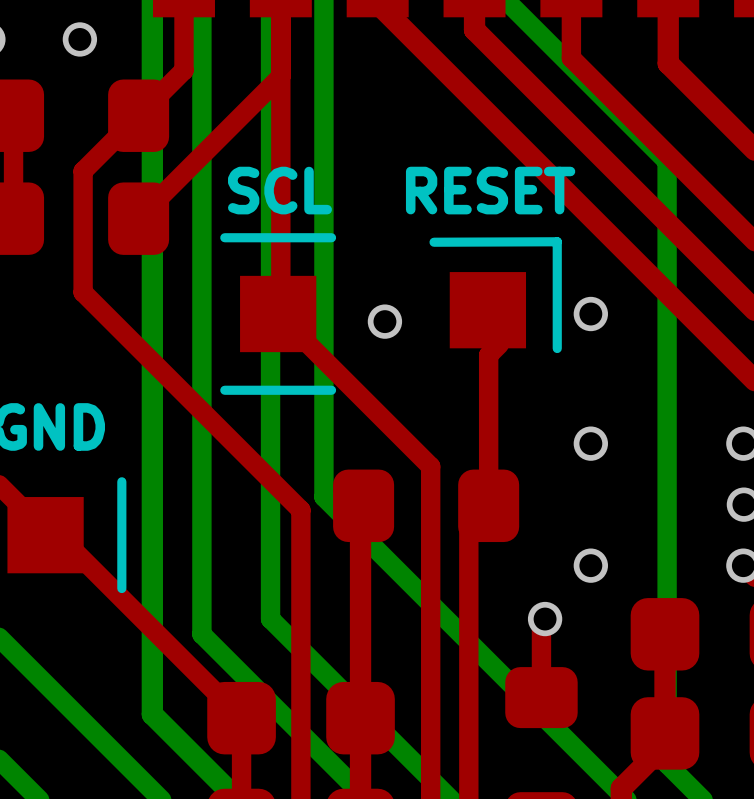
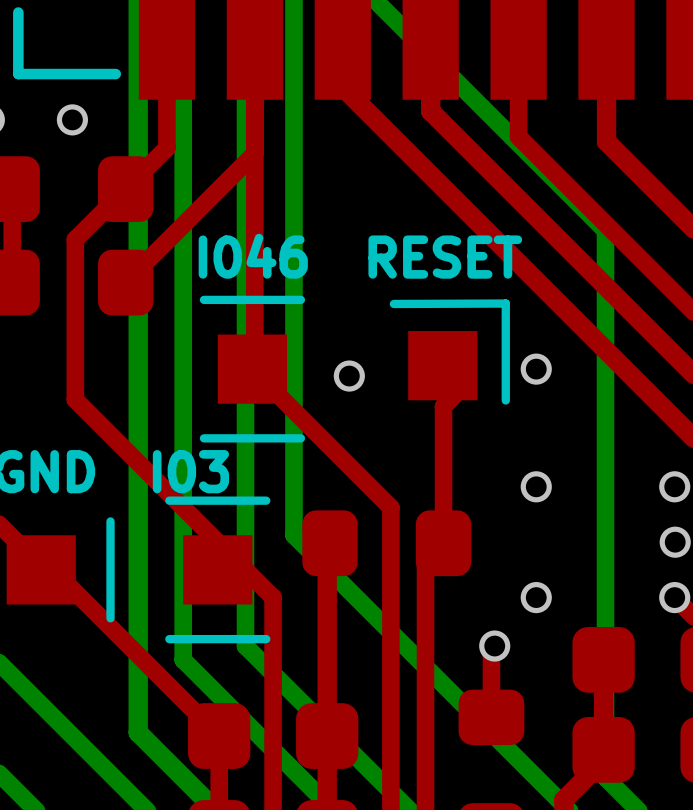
text: SCL (279, 190) -> I046 (253, 256)
top track: (83, 292) (300, 510) (300, 565) -> (75, 349) (75, 399) (273, 597)
text: none -> I03 (190, 471)
part: none -> (217, 569)

